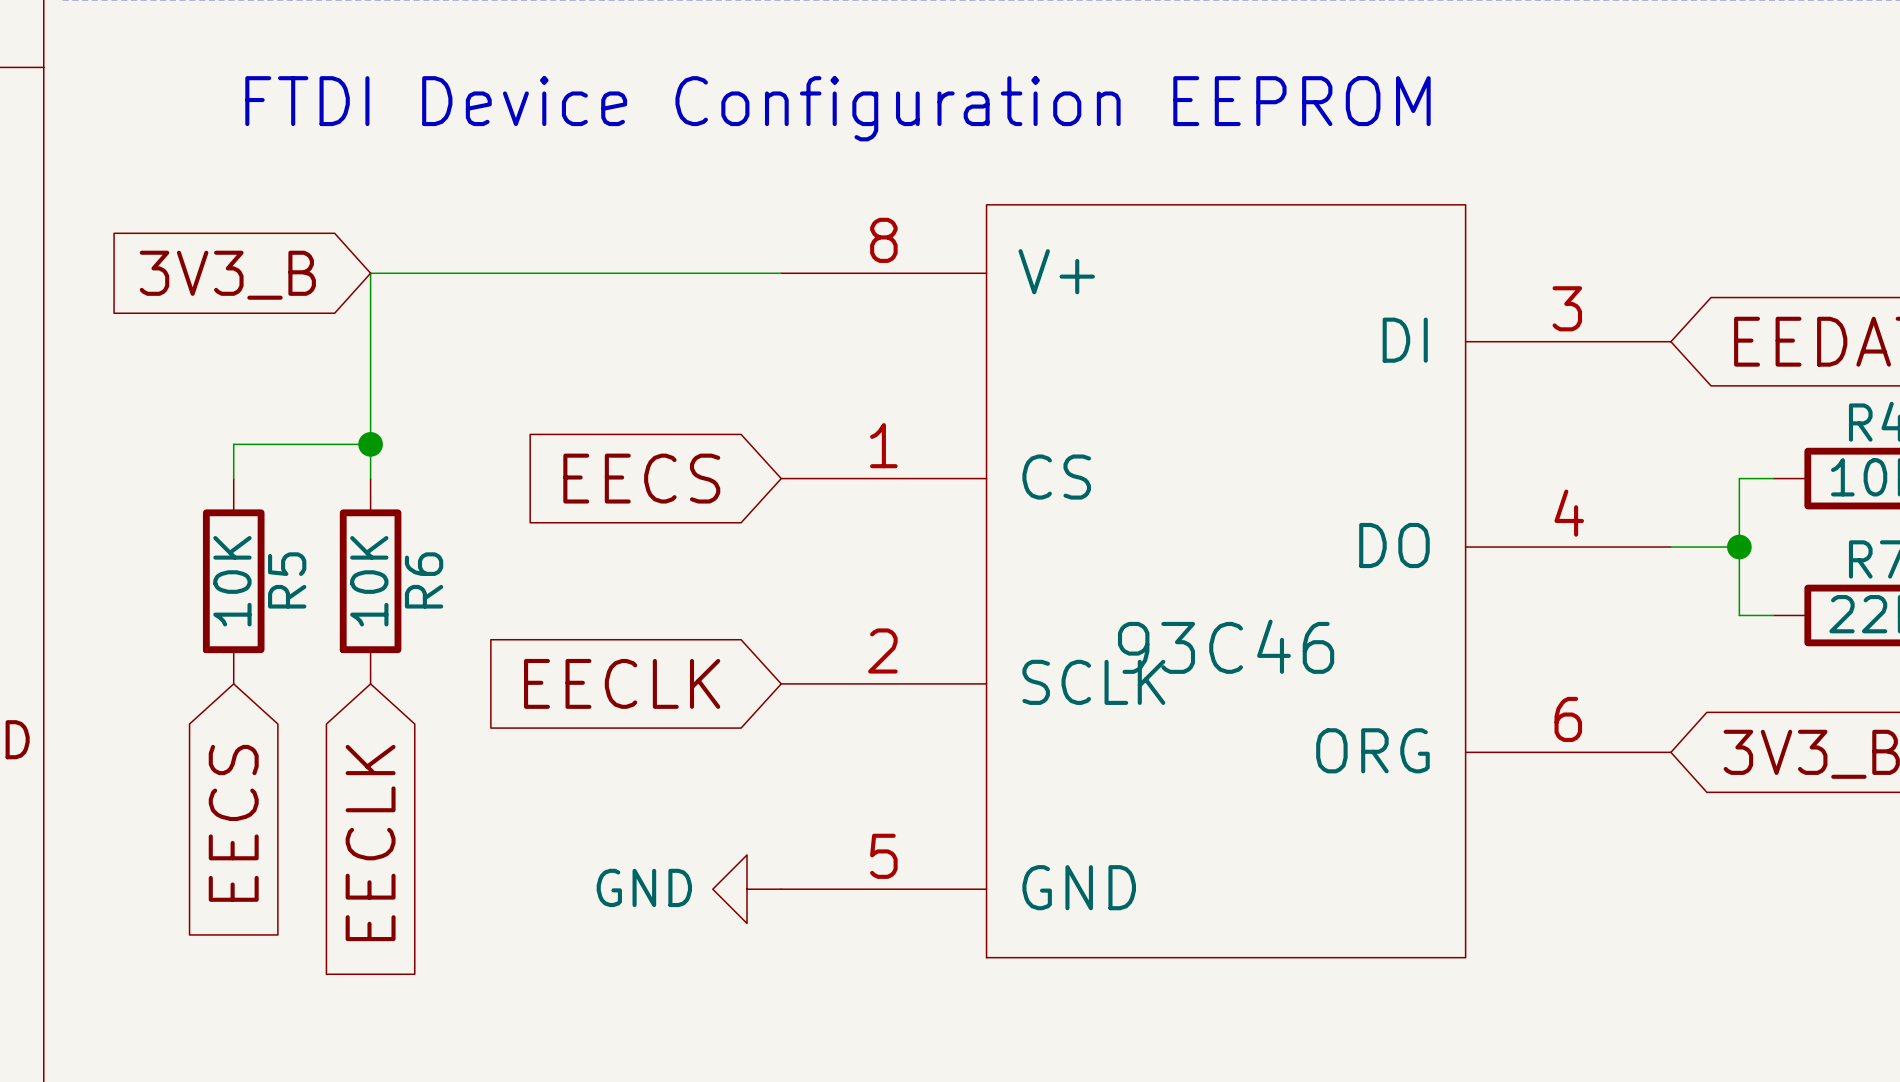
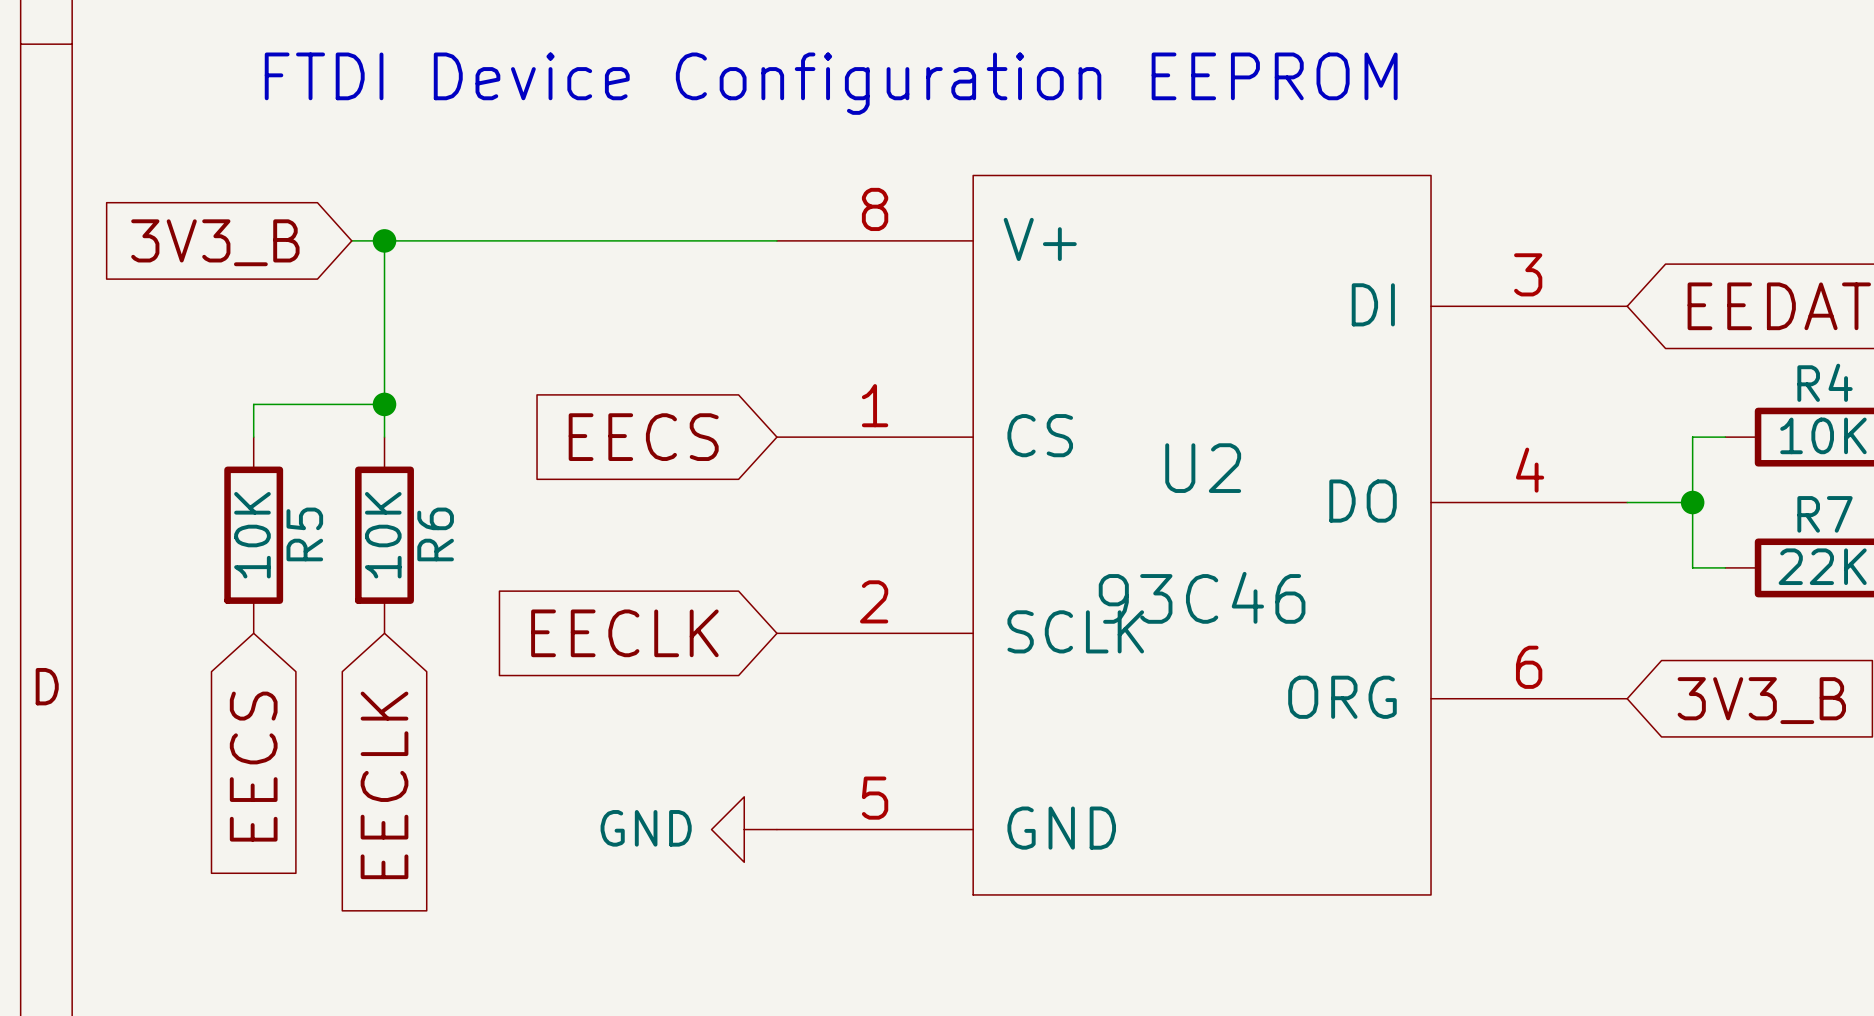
wire: none -> (351, 240) (384, 240)
junction: none -> (384, 240)
global label position: 3V3_B (227, 275) -> 3V3_B (215, 242)
U2 name: none -> U2 (1203, 468)

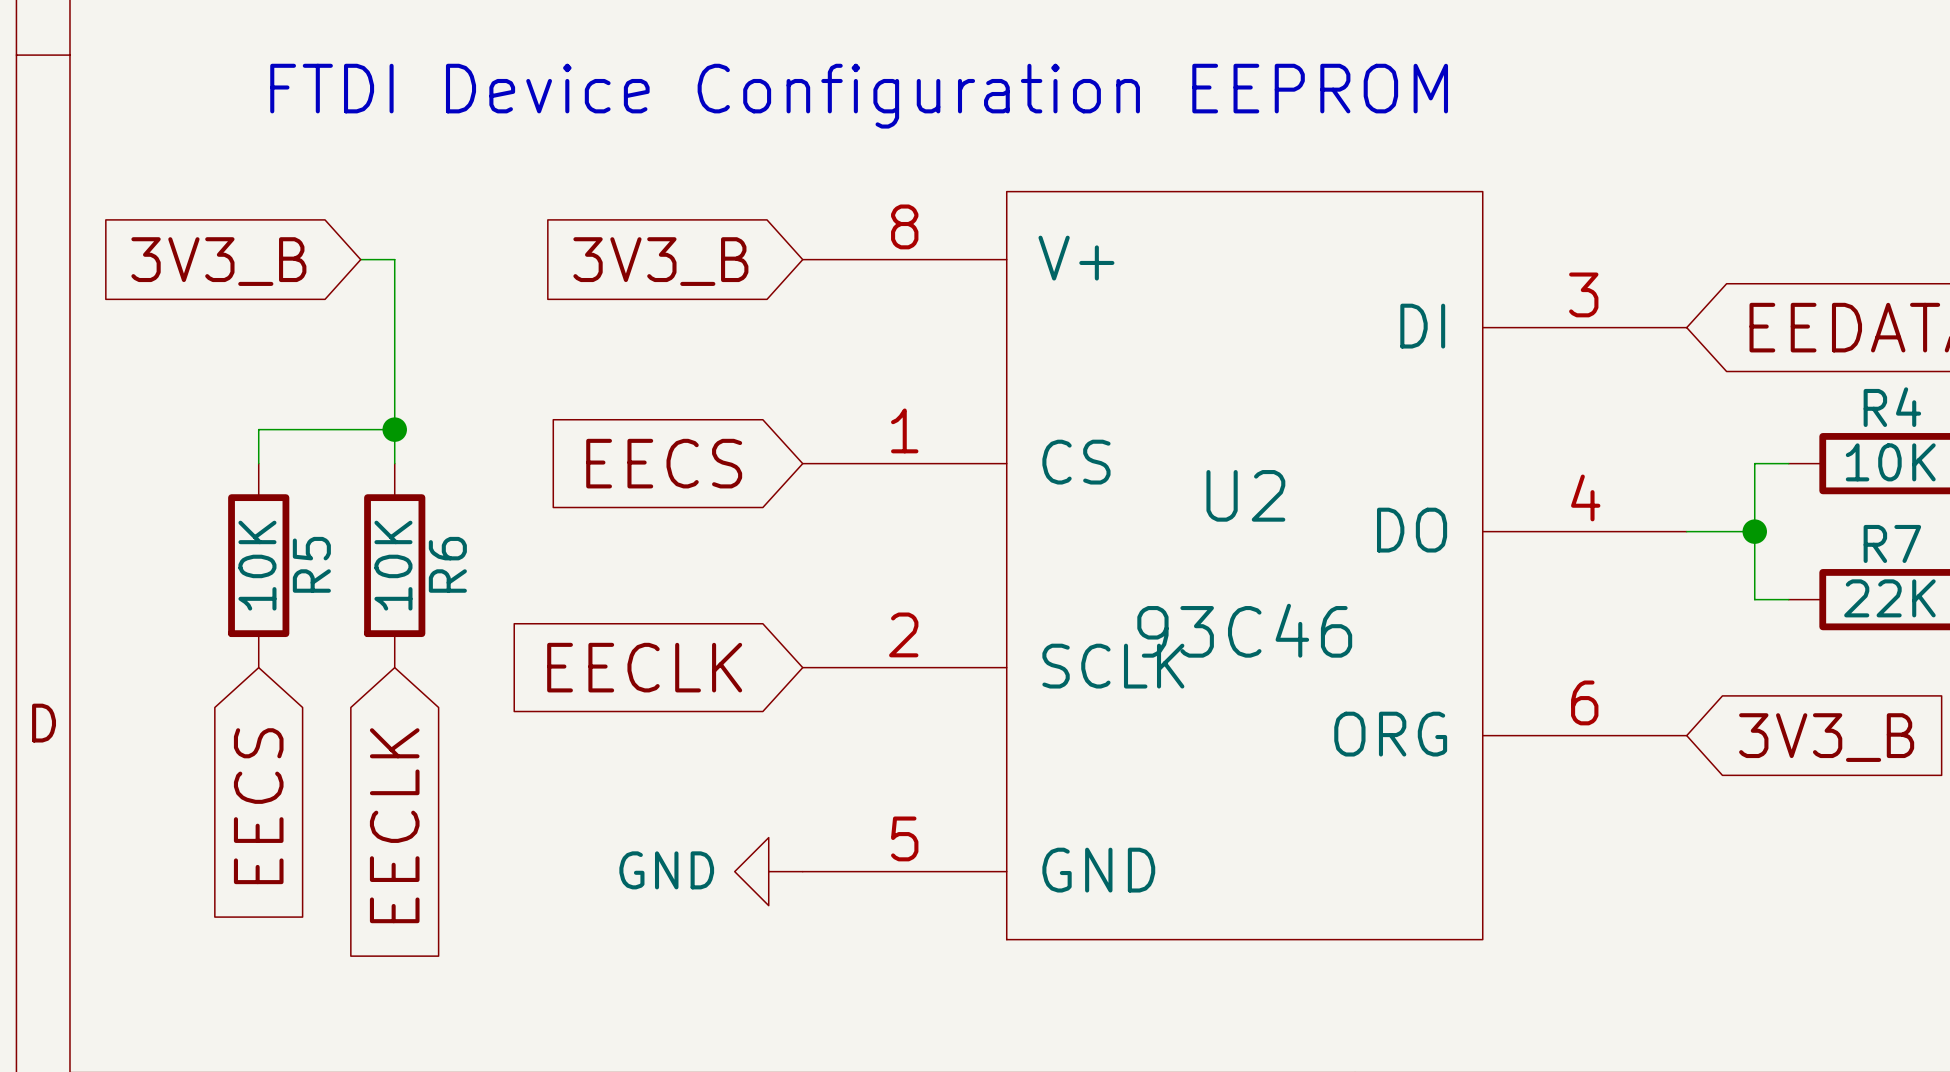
wire: (384, 240) (776, 240) -> none
junction: (384, 240) -> none
global label: none -> 3V3_B (660, 261)

